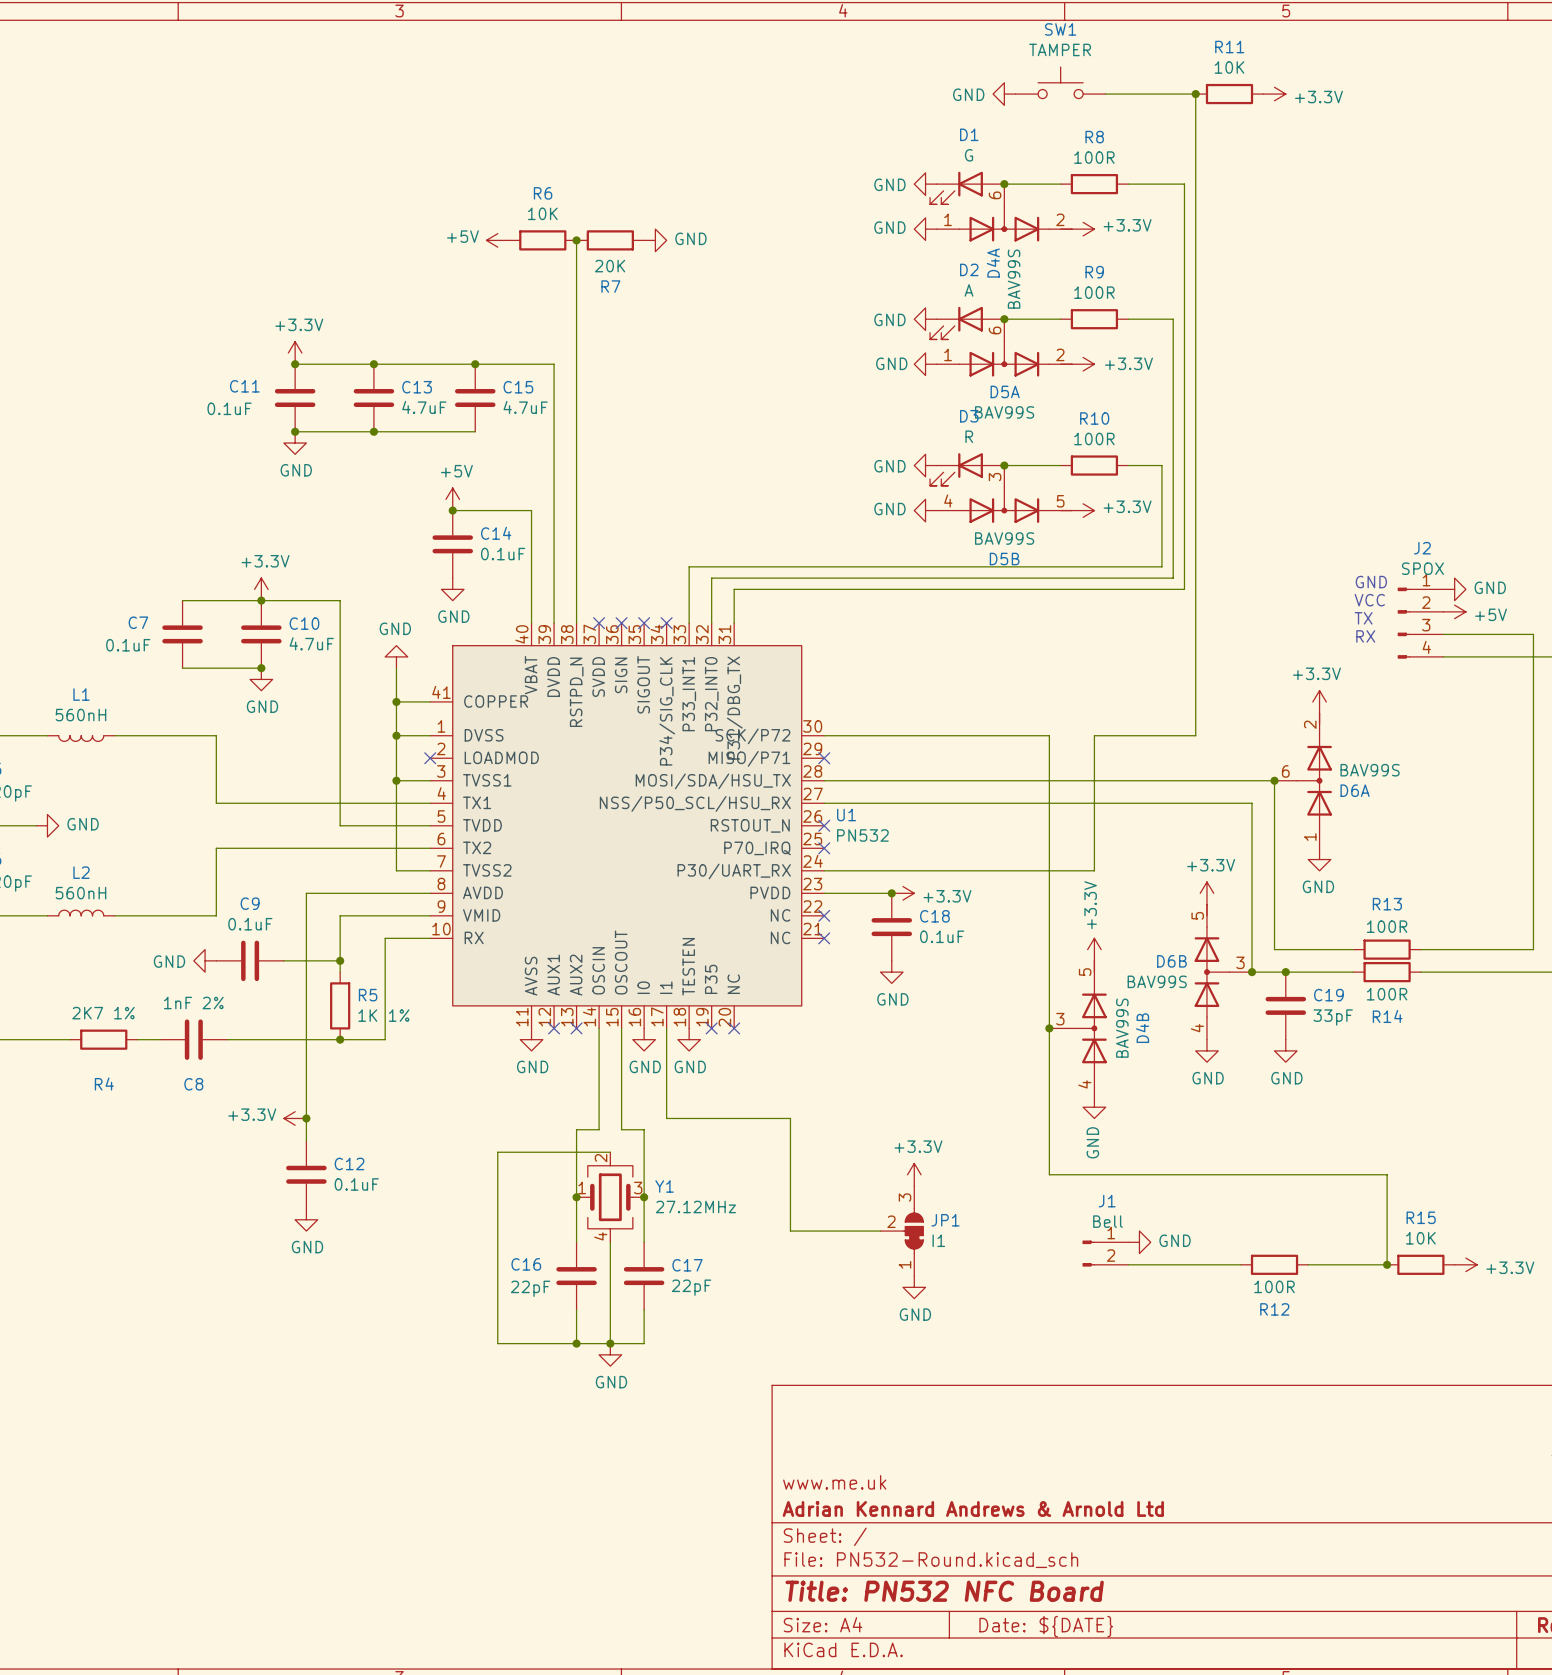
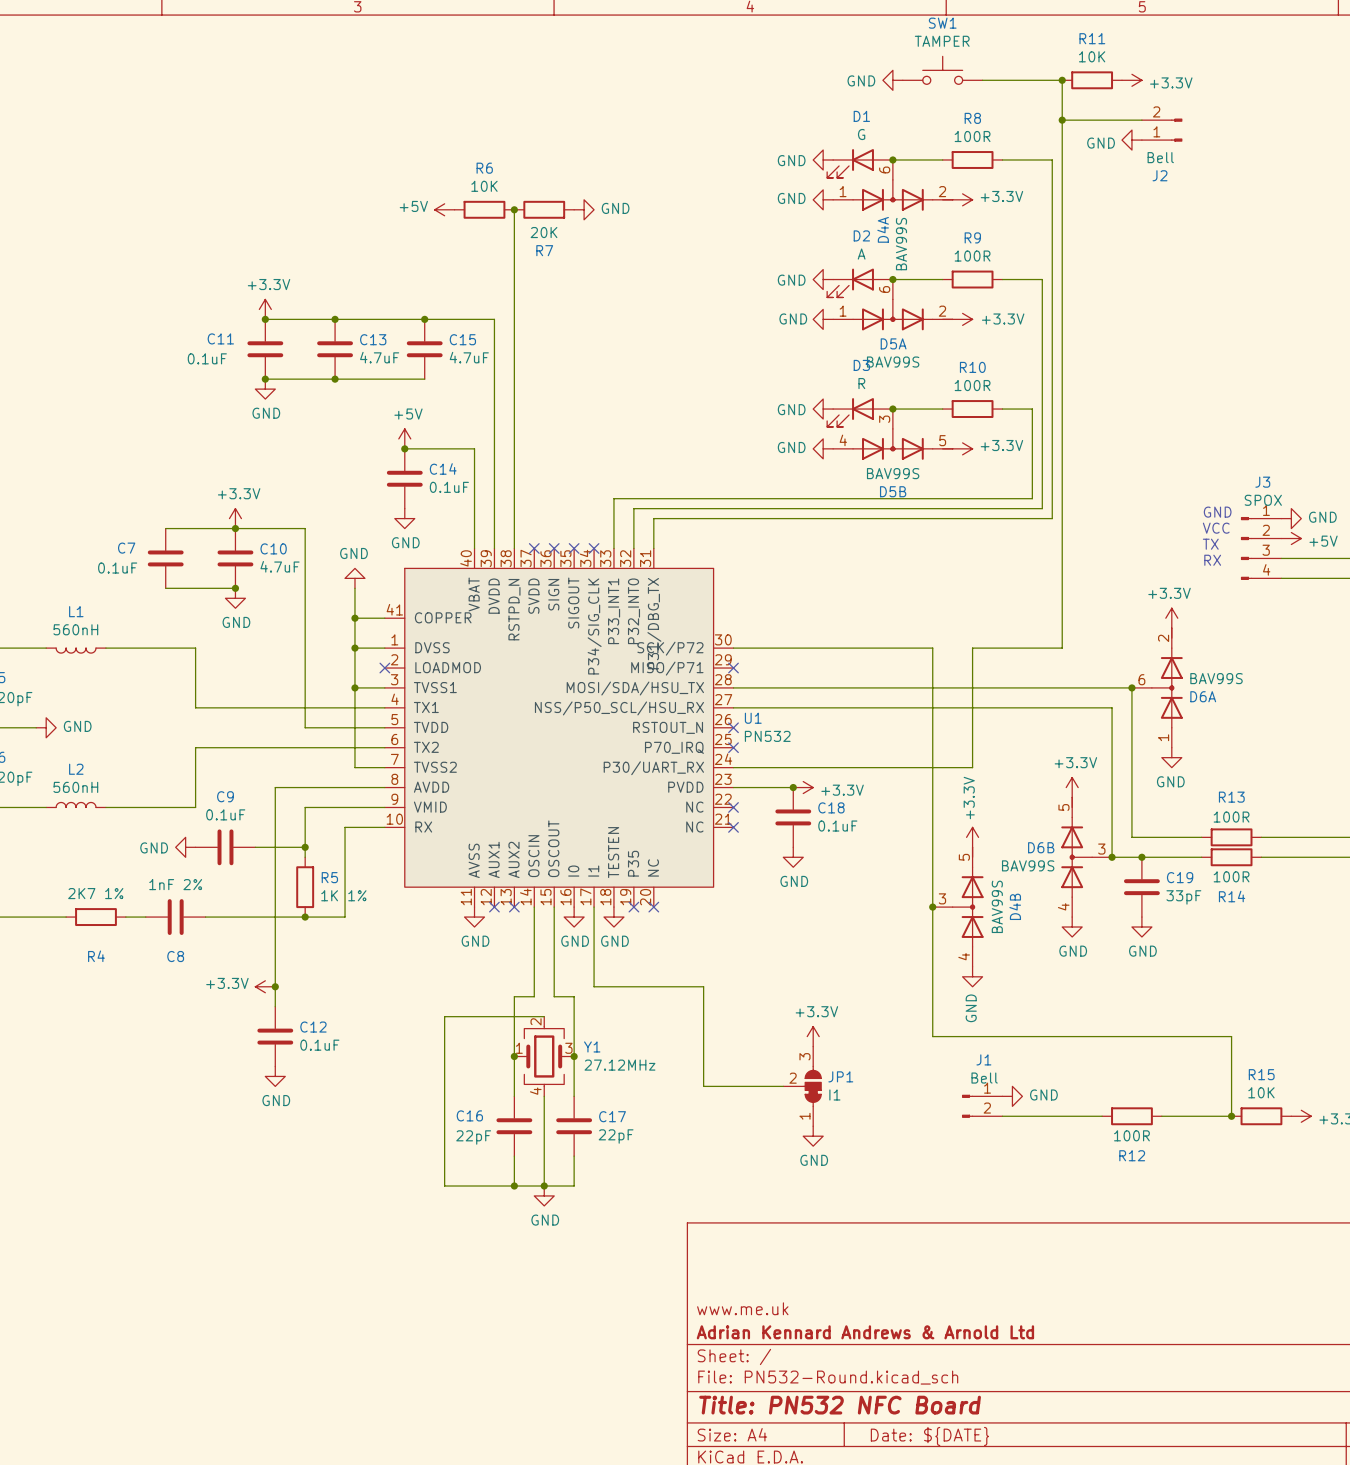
wire: none -> (1062, 120) (1141, 120)
junction: none -> (1062, 120)
J2: none -> Bell (1162, 130)
power symbol: none -> GND (1131, 140)
J2 name: J2 (1422, 548) -> J3 (1262, 482)

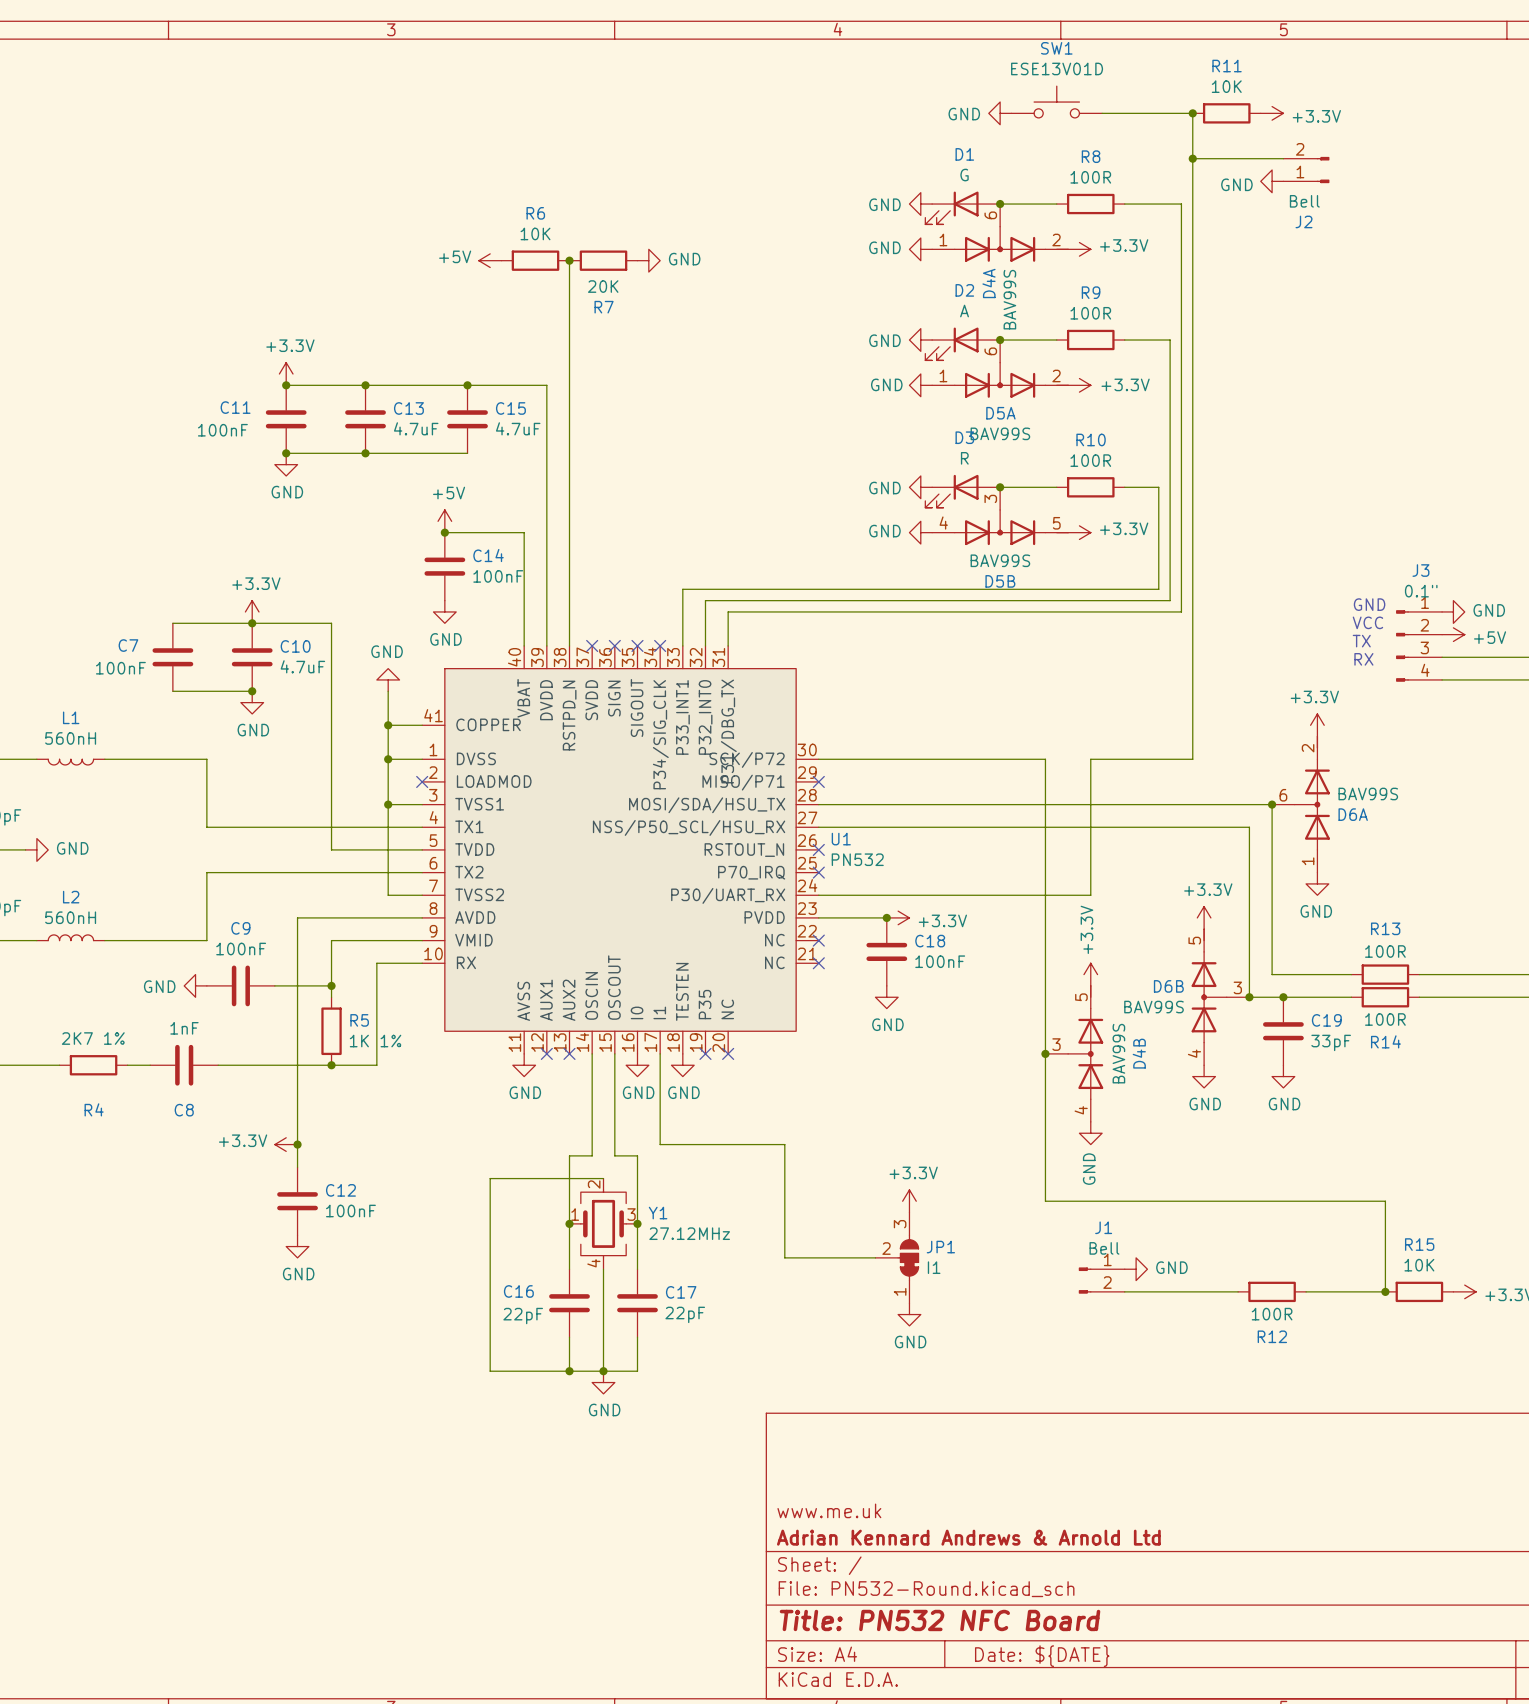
SW1 value: TAMPER (942, 41) -> ESE13V01D (1057, 68)
C11 value: 0.1uF (207, 358) -> 100nF (222, 430)
C14 value: 0.1uF (449, 487) -> 100nF (498, 576)
J3 value: SPOX (1263, 500) -> 0.1" (1421, 591)
C7 value: 0.1uF (117, 568) -> 100nF (120, 668)
C9 value: 0.1uF (225, 814) -> 100nF (241, 949)
C18 value: 0.1uF (837, 826) -> 100nF (940, 961)
C8 value: 1nF 2% (175, 884) -> 1nF (184, 1028)
C12 value: 0.1uF (319, 1045) -> 100nF (350, 1211)

